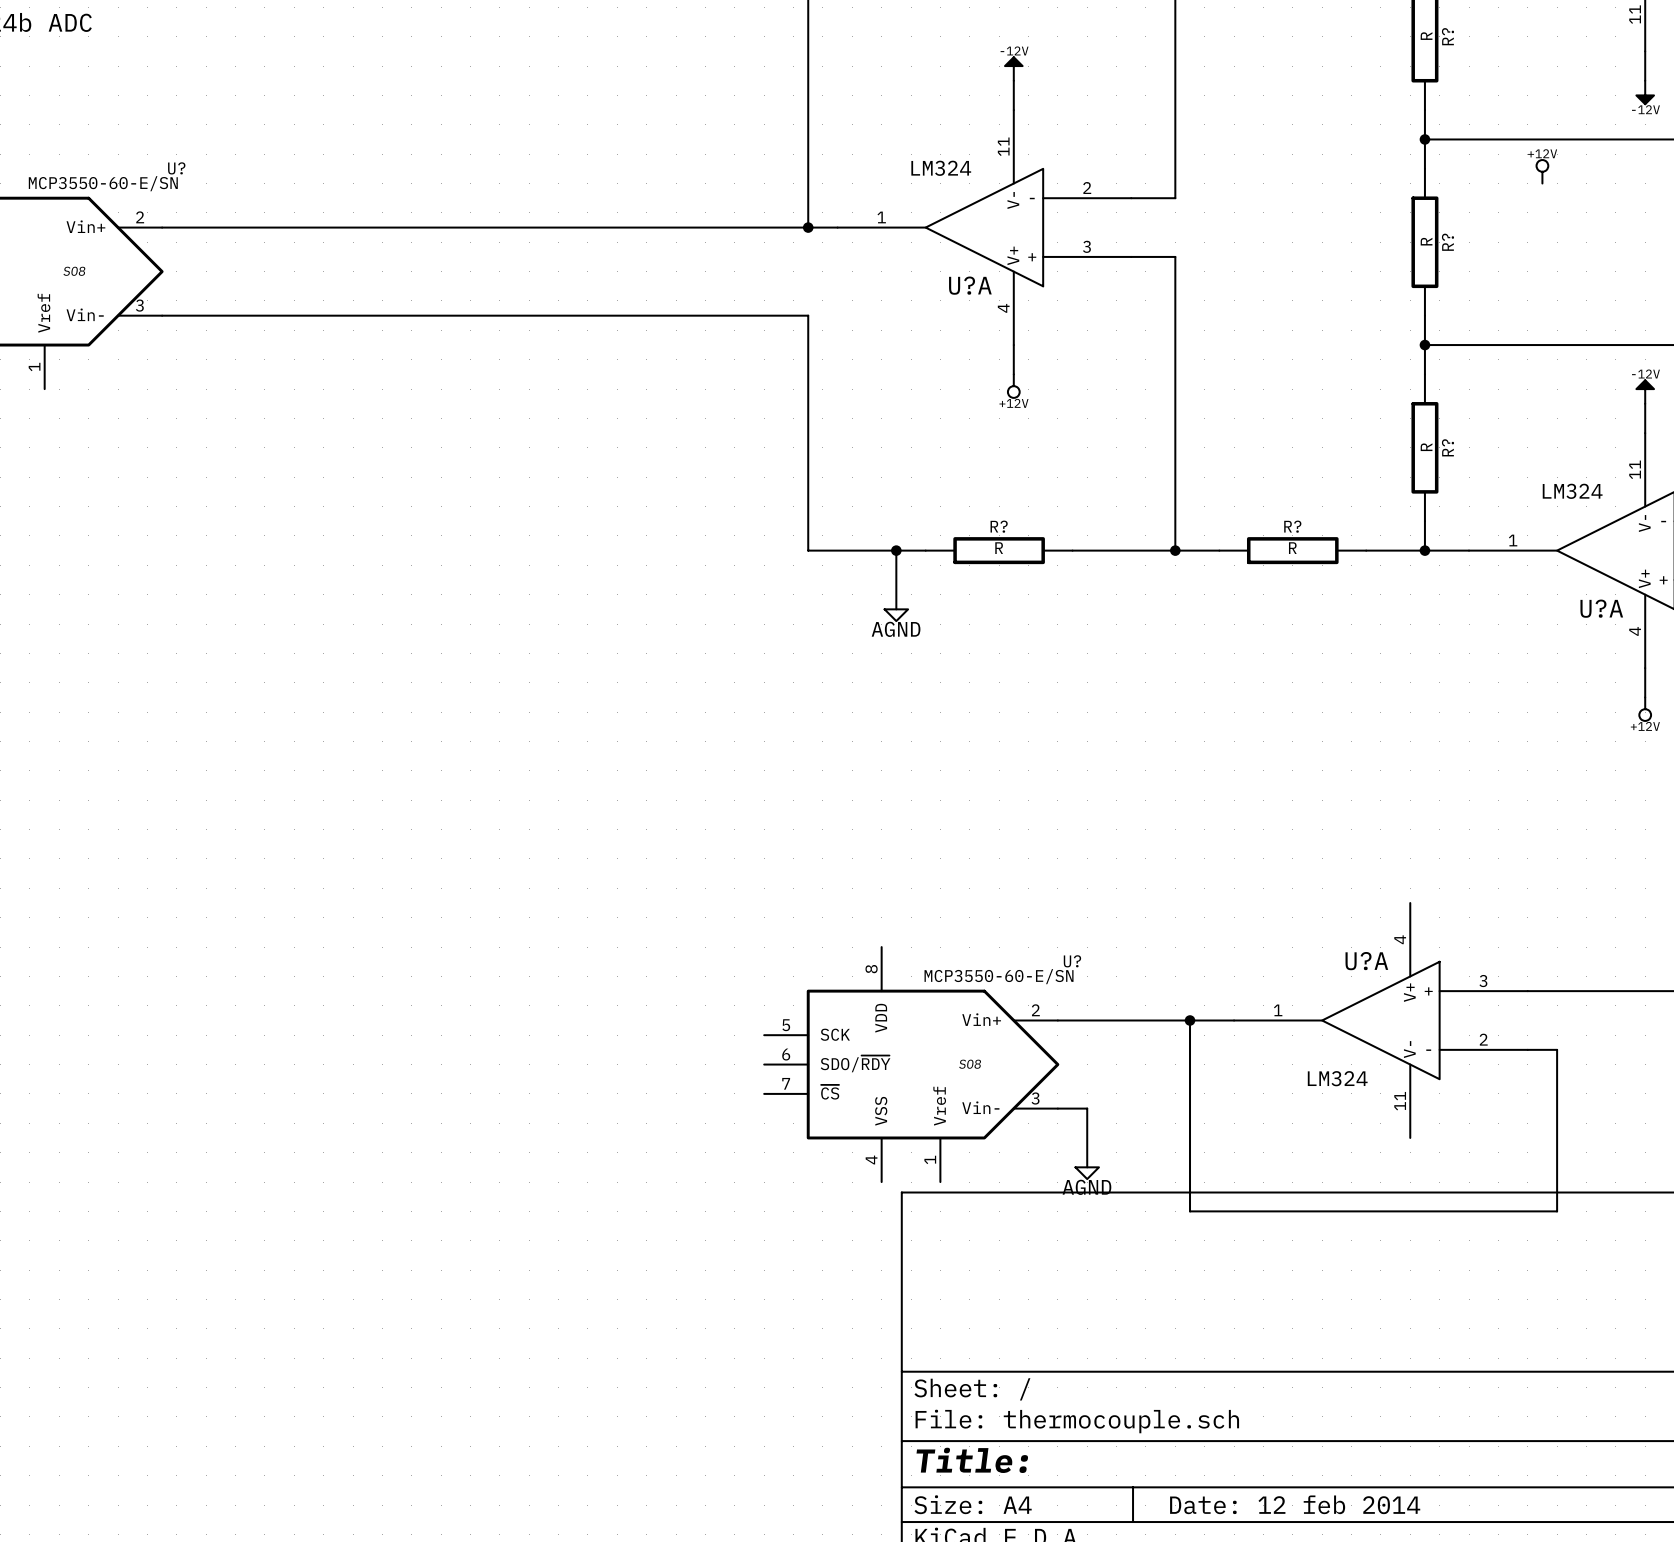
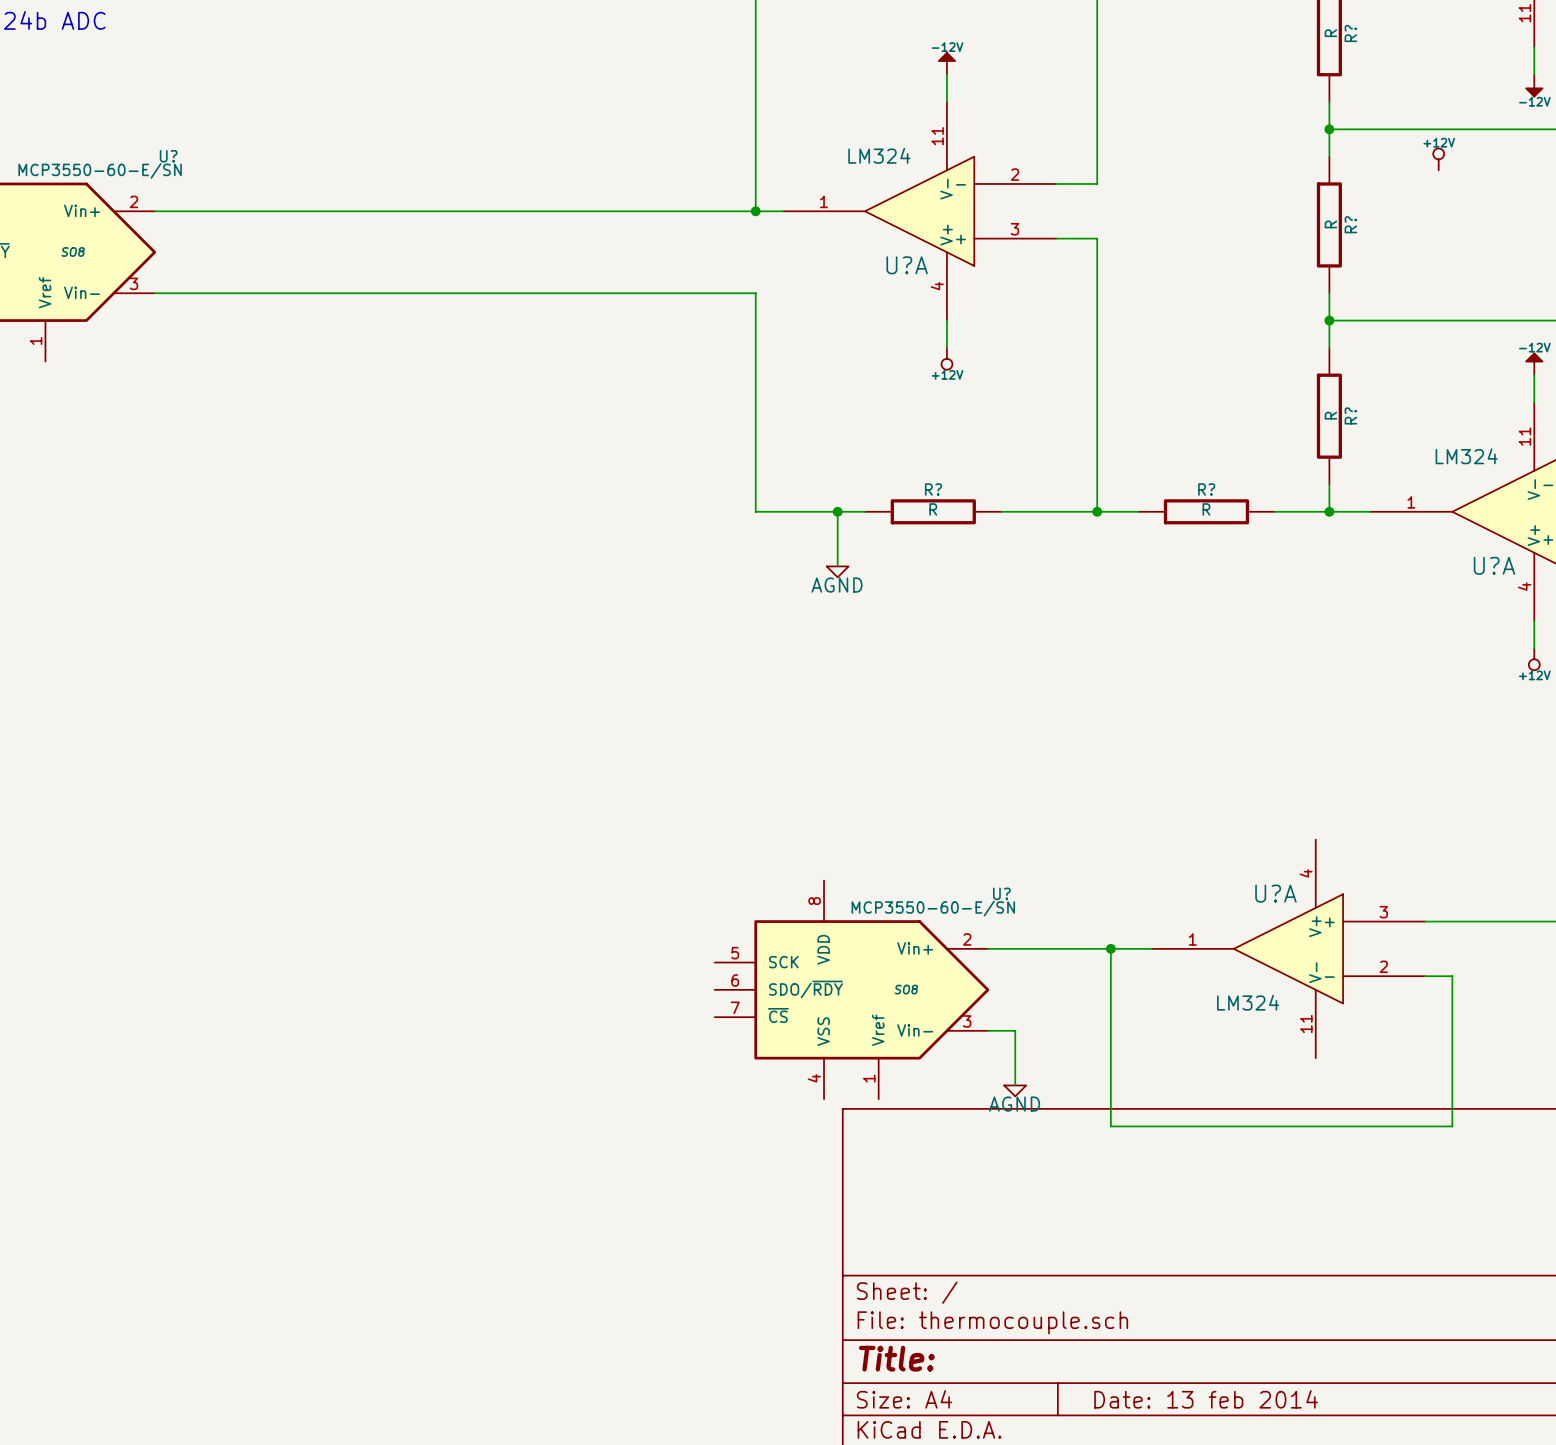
title block: Date: 12 feb 2014 (1295, 1504) -> Date: 13 feb 2014 (1206, 1399)

